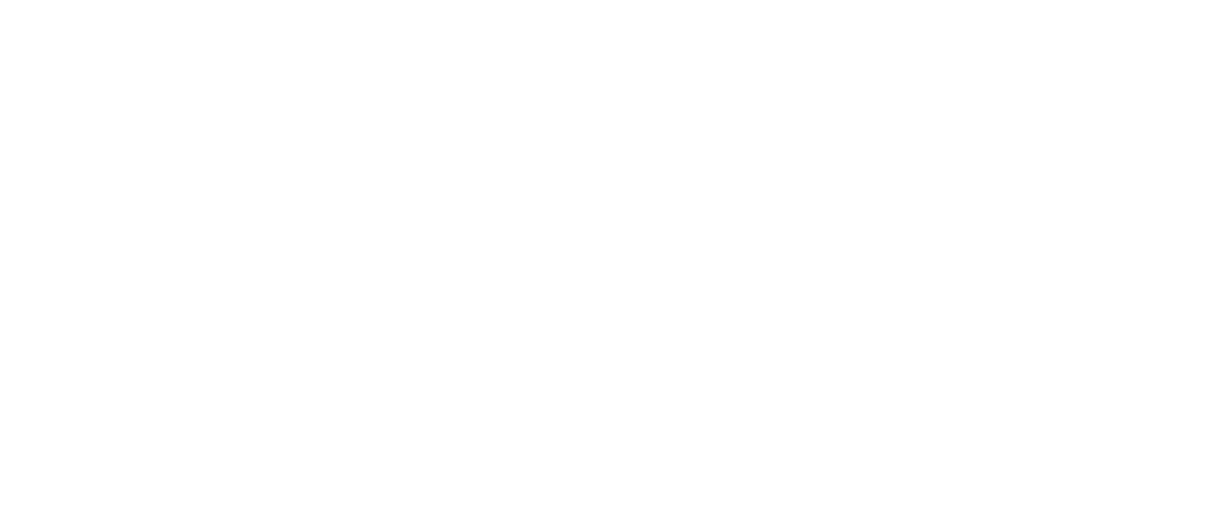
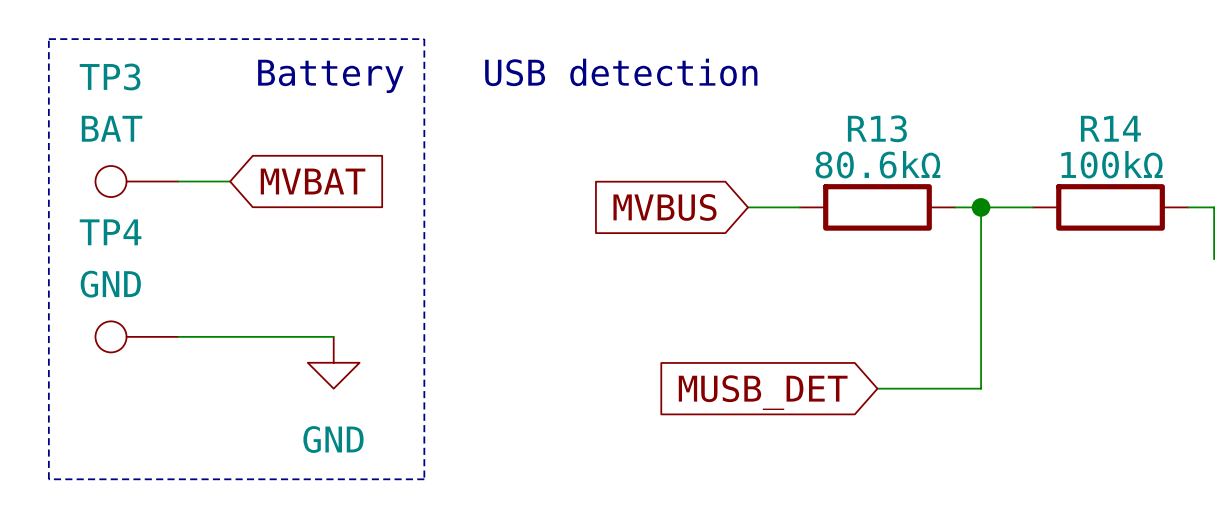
line: none -> (48, 39) (424, 39) (424, 479) (48, 479) (48, 39)
text: none -> USB detection (621, 72)
text: none -> Battery (330, 76)
TP3: none -> BAT (136, 181)
wire: none -> (178, 181) (230, 181)
global label: none -> MVBAT (313, 181)
global label: none -> MVBUS (665, 207)
wire: none -> (748, 207) (799, 207)
R13: none -> 80.6kΩ (877, 207)
wire: none -> (955, 207) (1032, 207)
wire: none -> (981, 207) (981, 388) (877, 388)
junction: none -> (981, 207)
R14: none -> 100kΩ (1110, 207)
wire: none -> (1188, 207) (1214, 207) (1214, 259)
TP4: none -> GND (136, 336)
wire: none -> (178, 336) (333, 336)
power symbol: none -> GND (333, 362)
global label: none -> MUSB_DET (763, 392)

